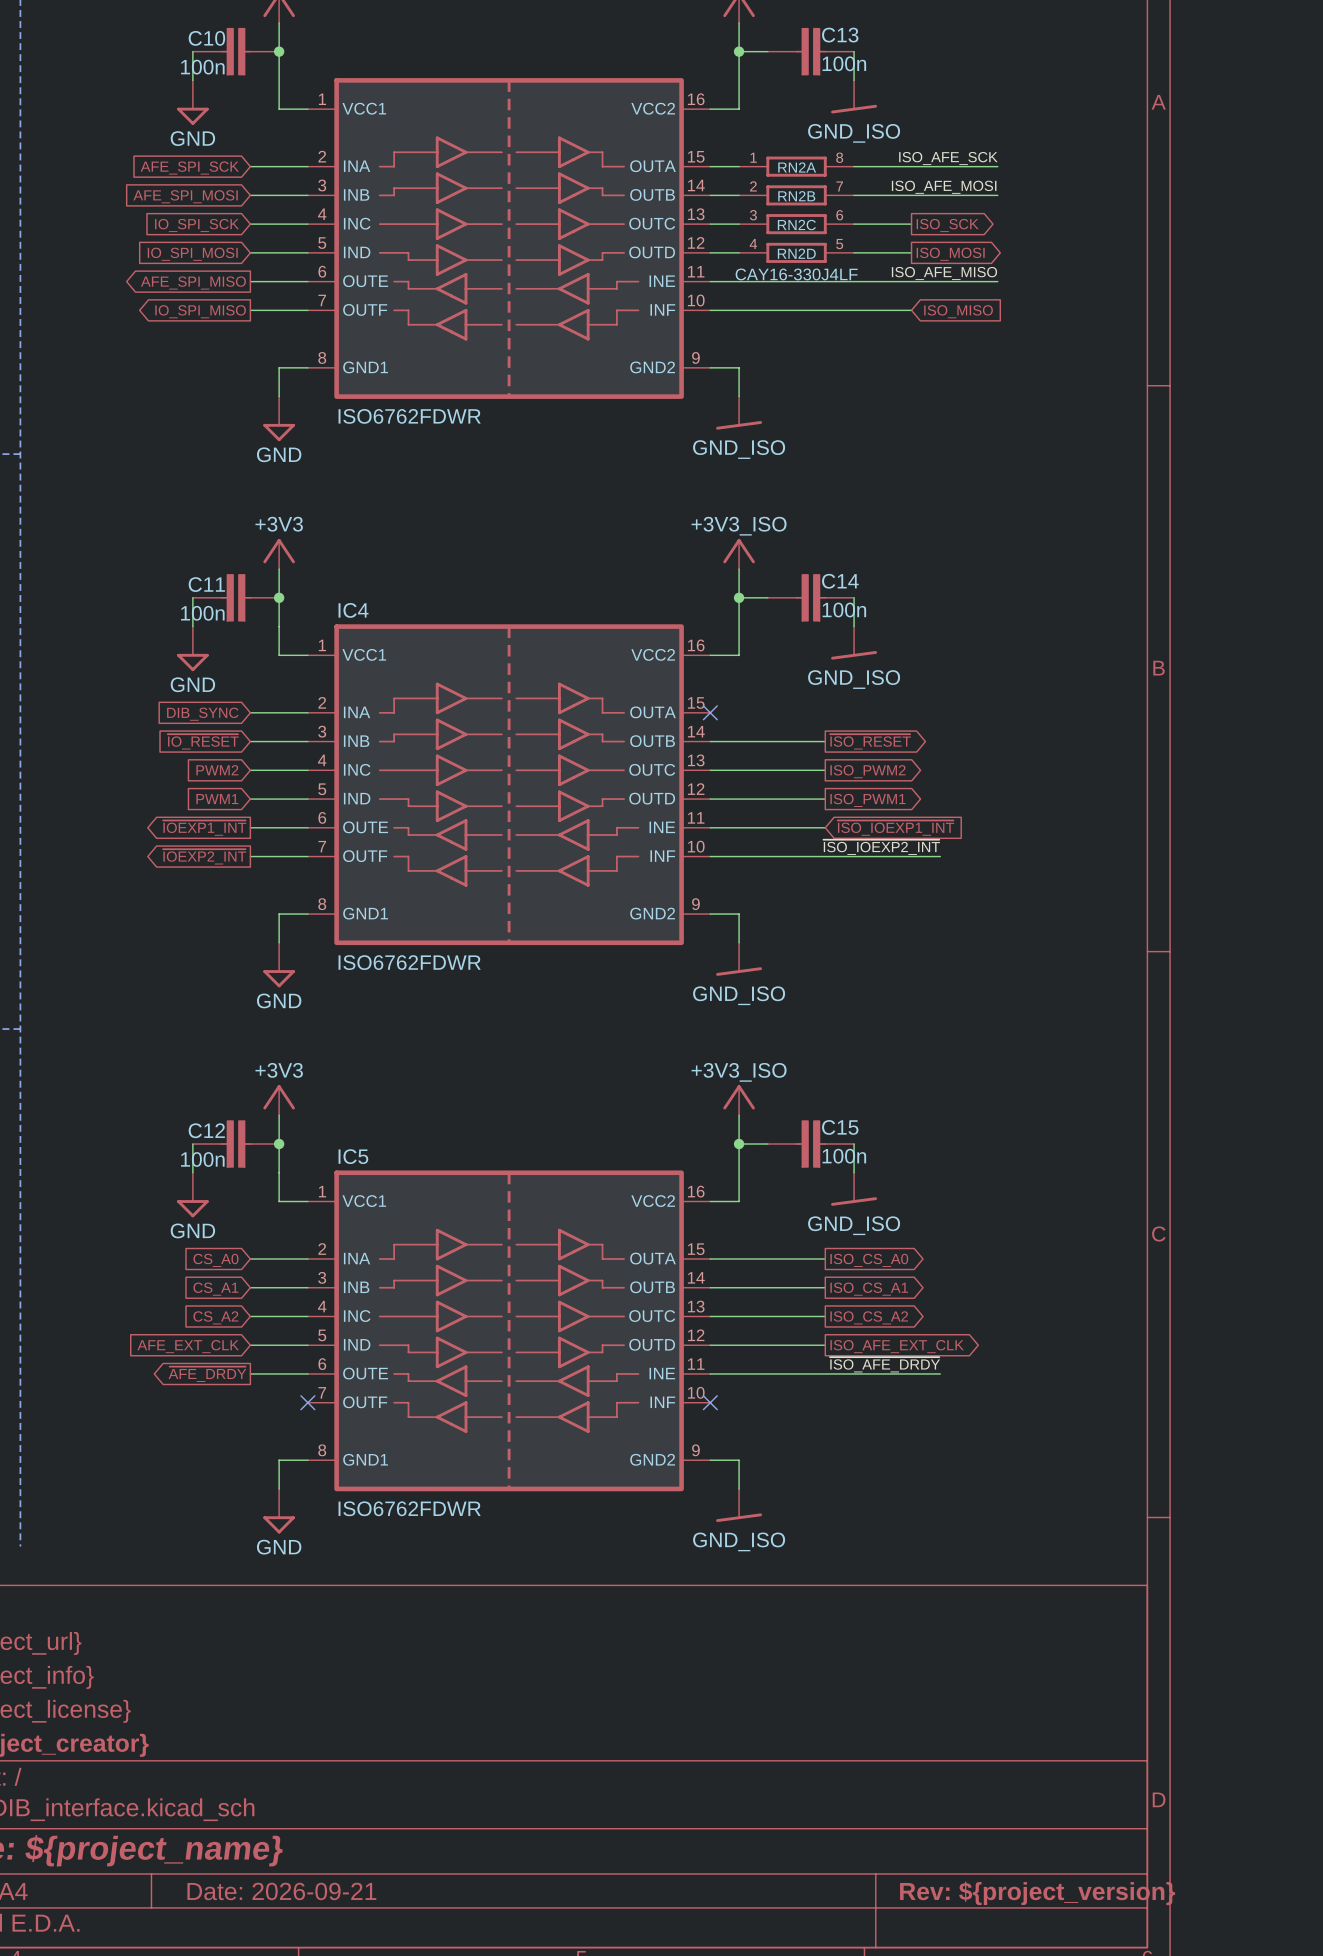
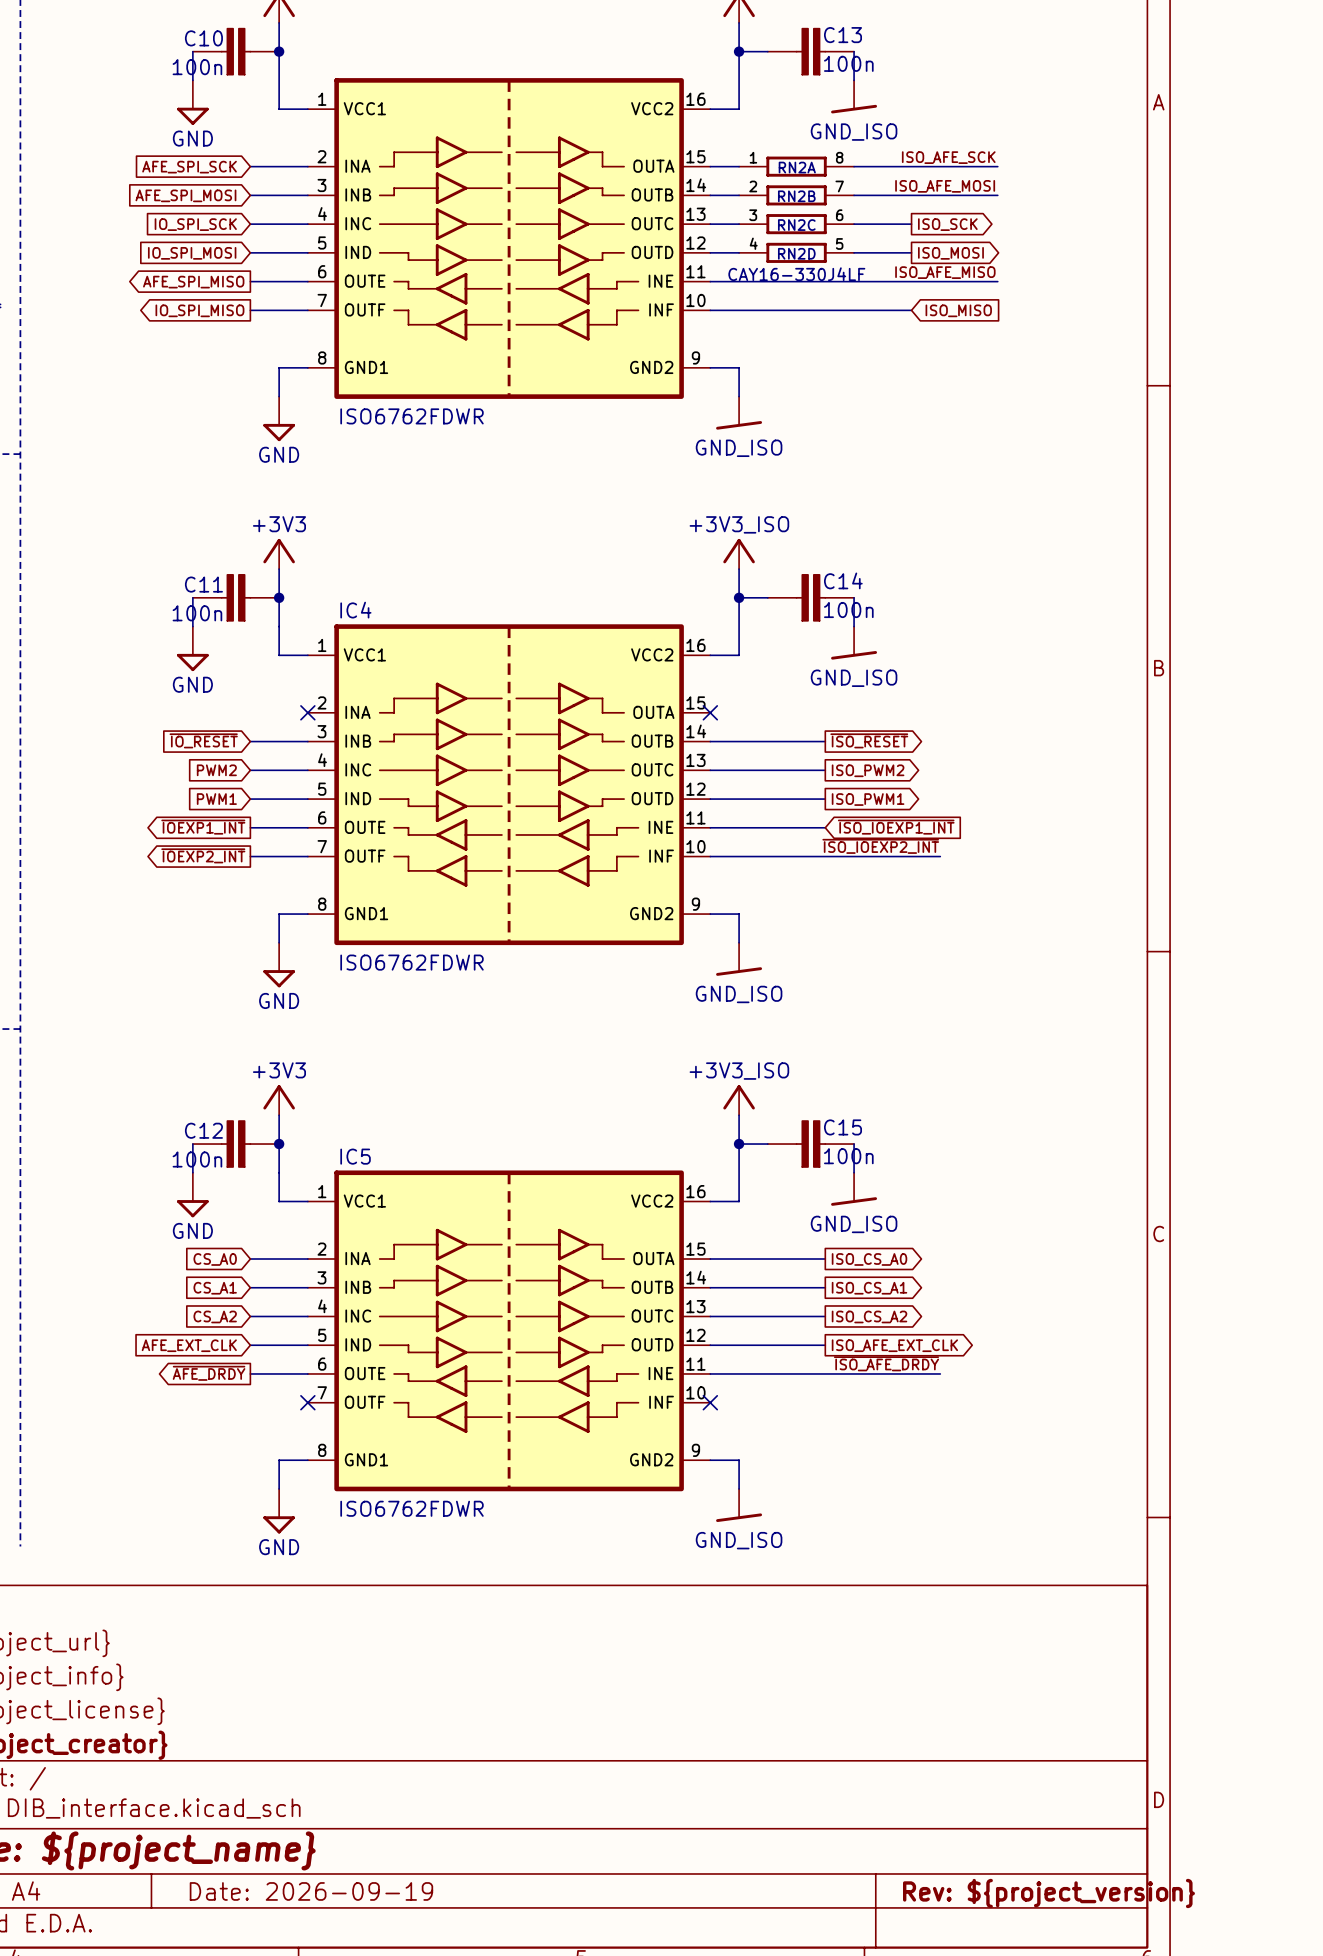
wire: (250, 712) (307, 712) -> none
no-connect mark: none -> (307, 712)
global label: DIB_SYNC (202, 714) -> none
title block: Date: 2026-09-21 (281, 1891) -> Date: 2026-09-19 (311, 1891)

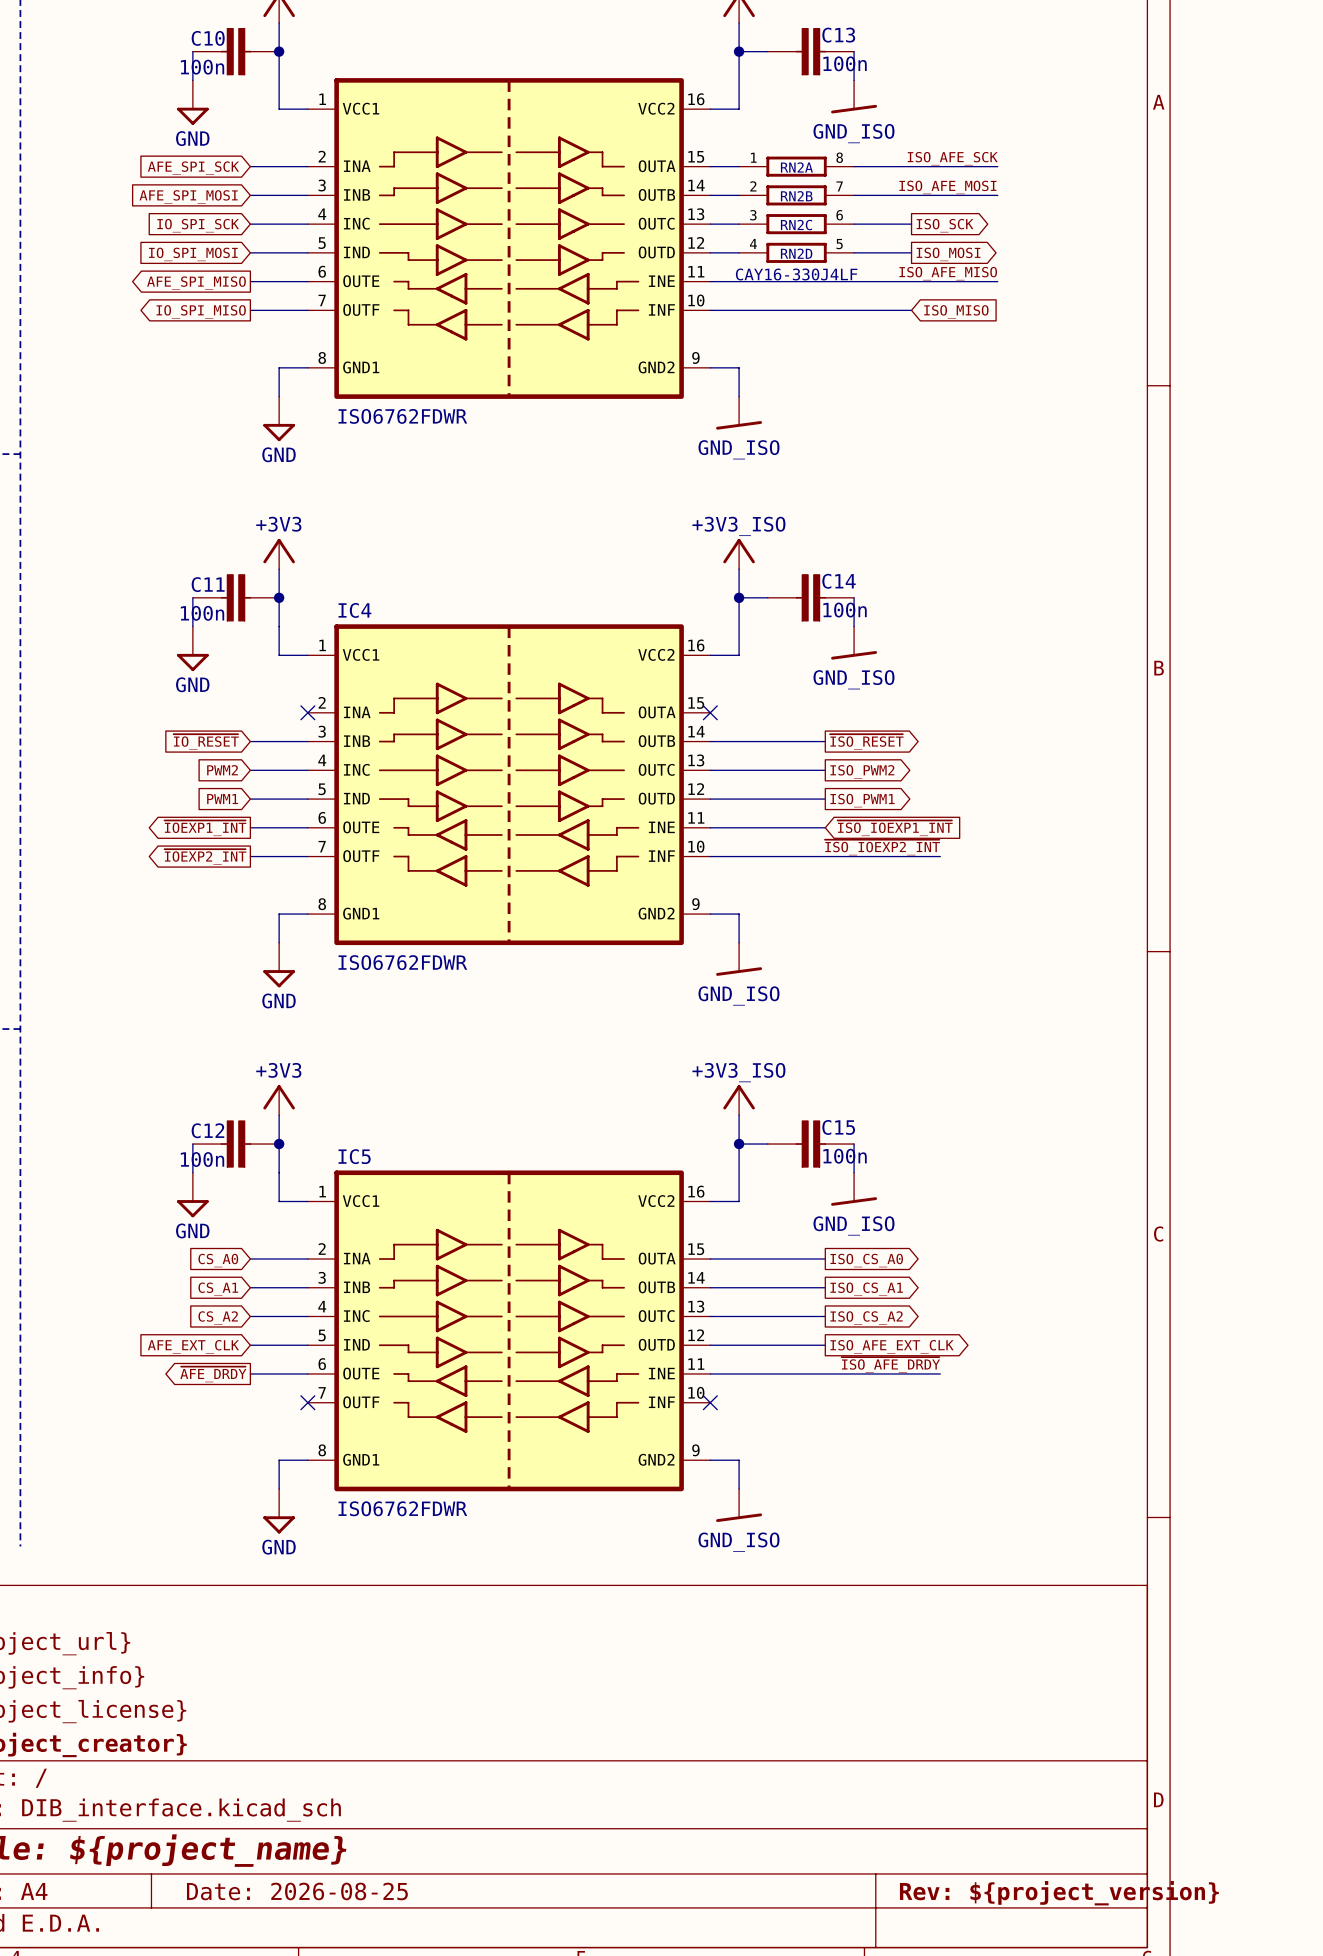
title block: Date: 2026-09-19 (311, 1891) -> Date: 2026-08-25 (297, 1891)

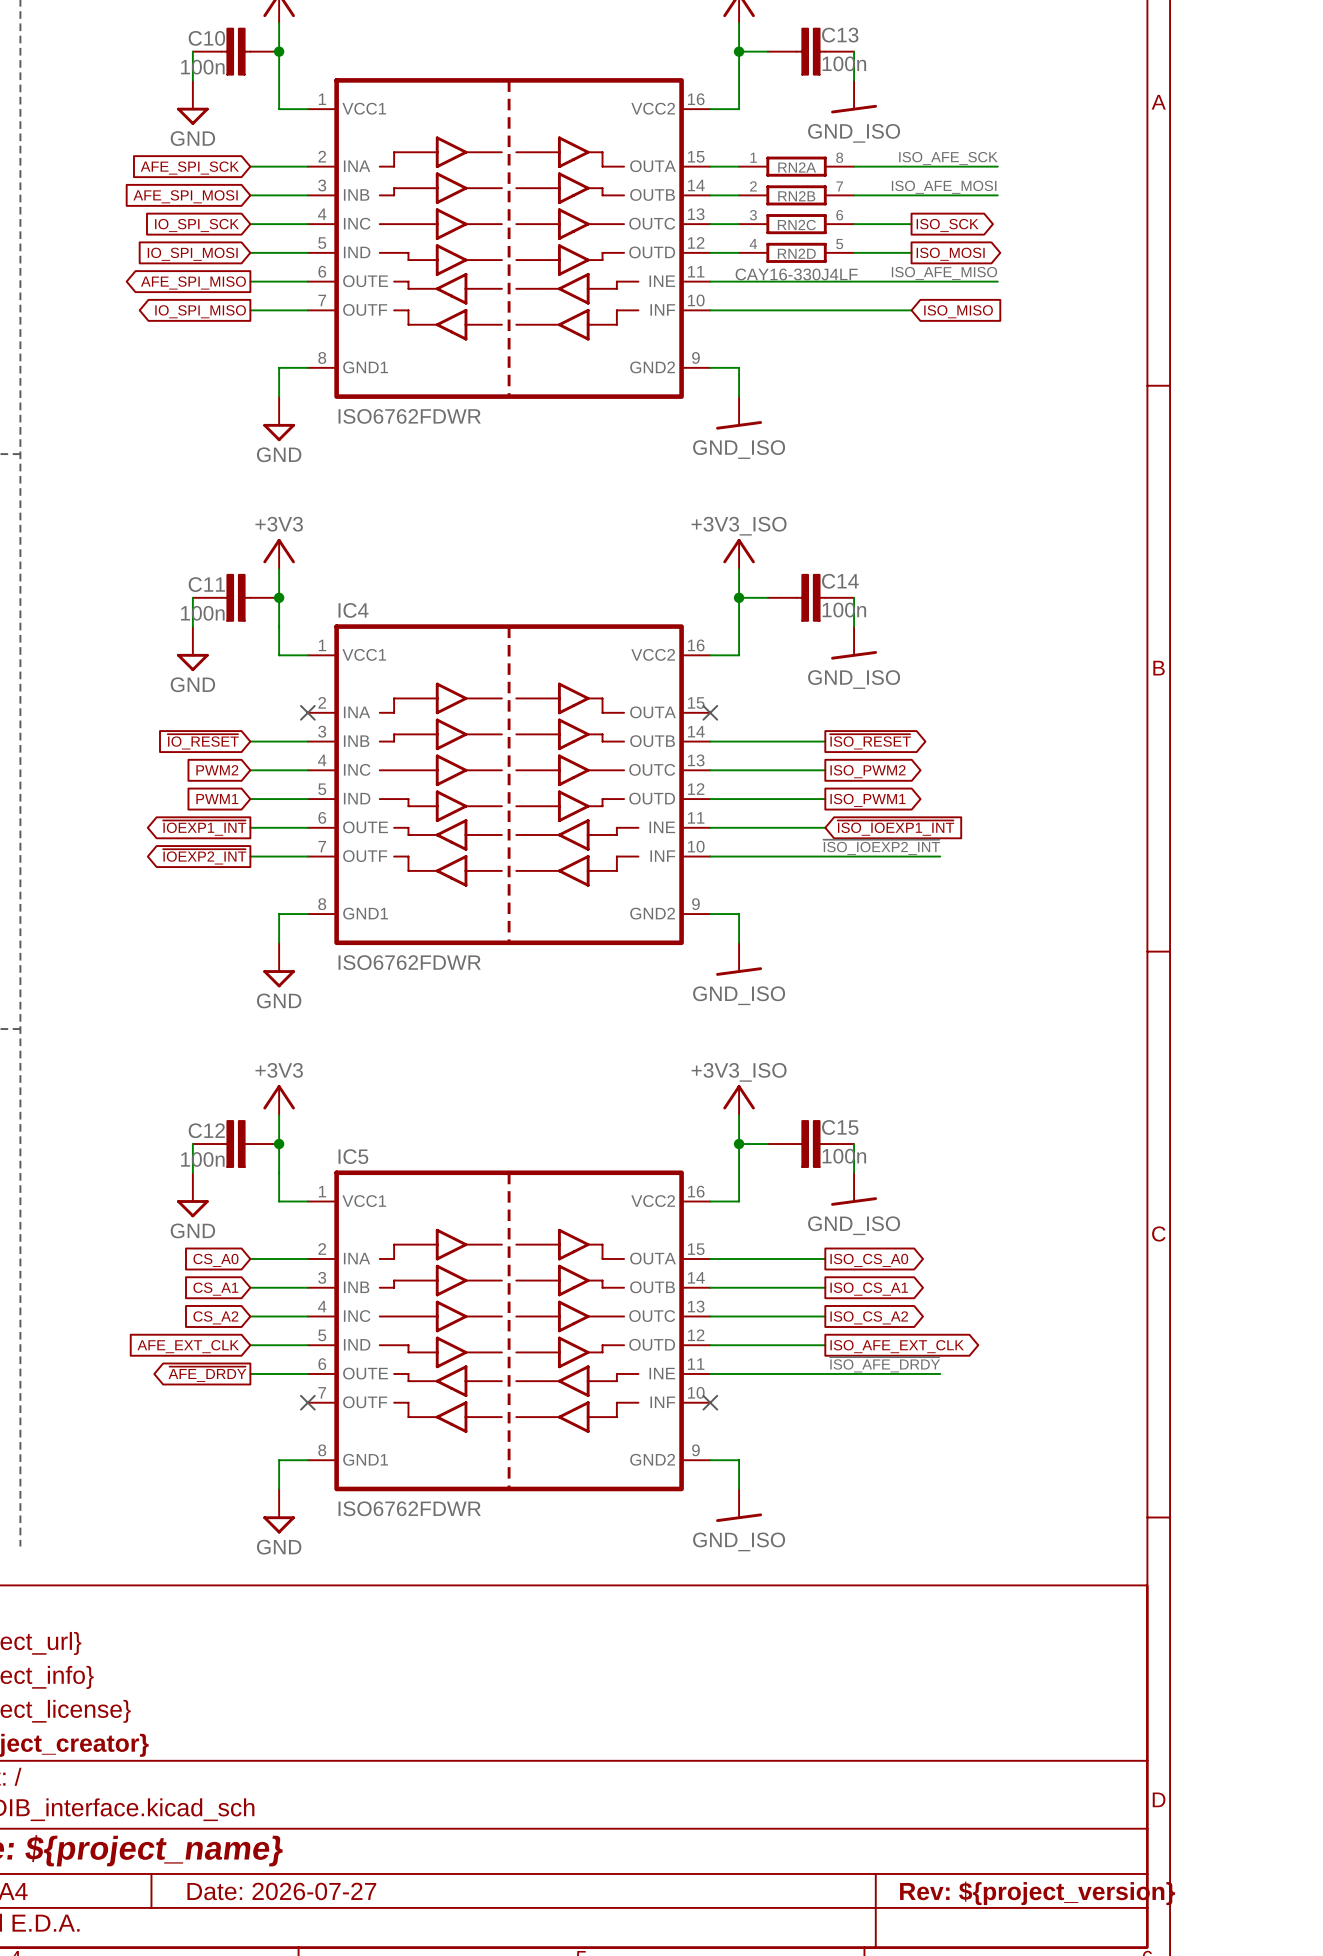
title block: Date: 2026-08-25 (297, 1891) -> Date: 2026-07-27 (281, 1891)

